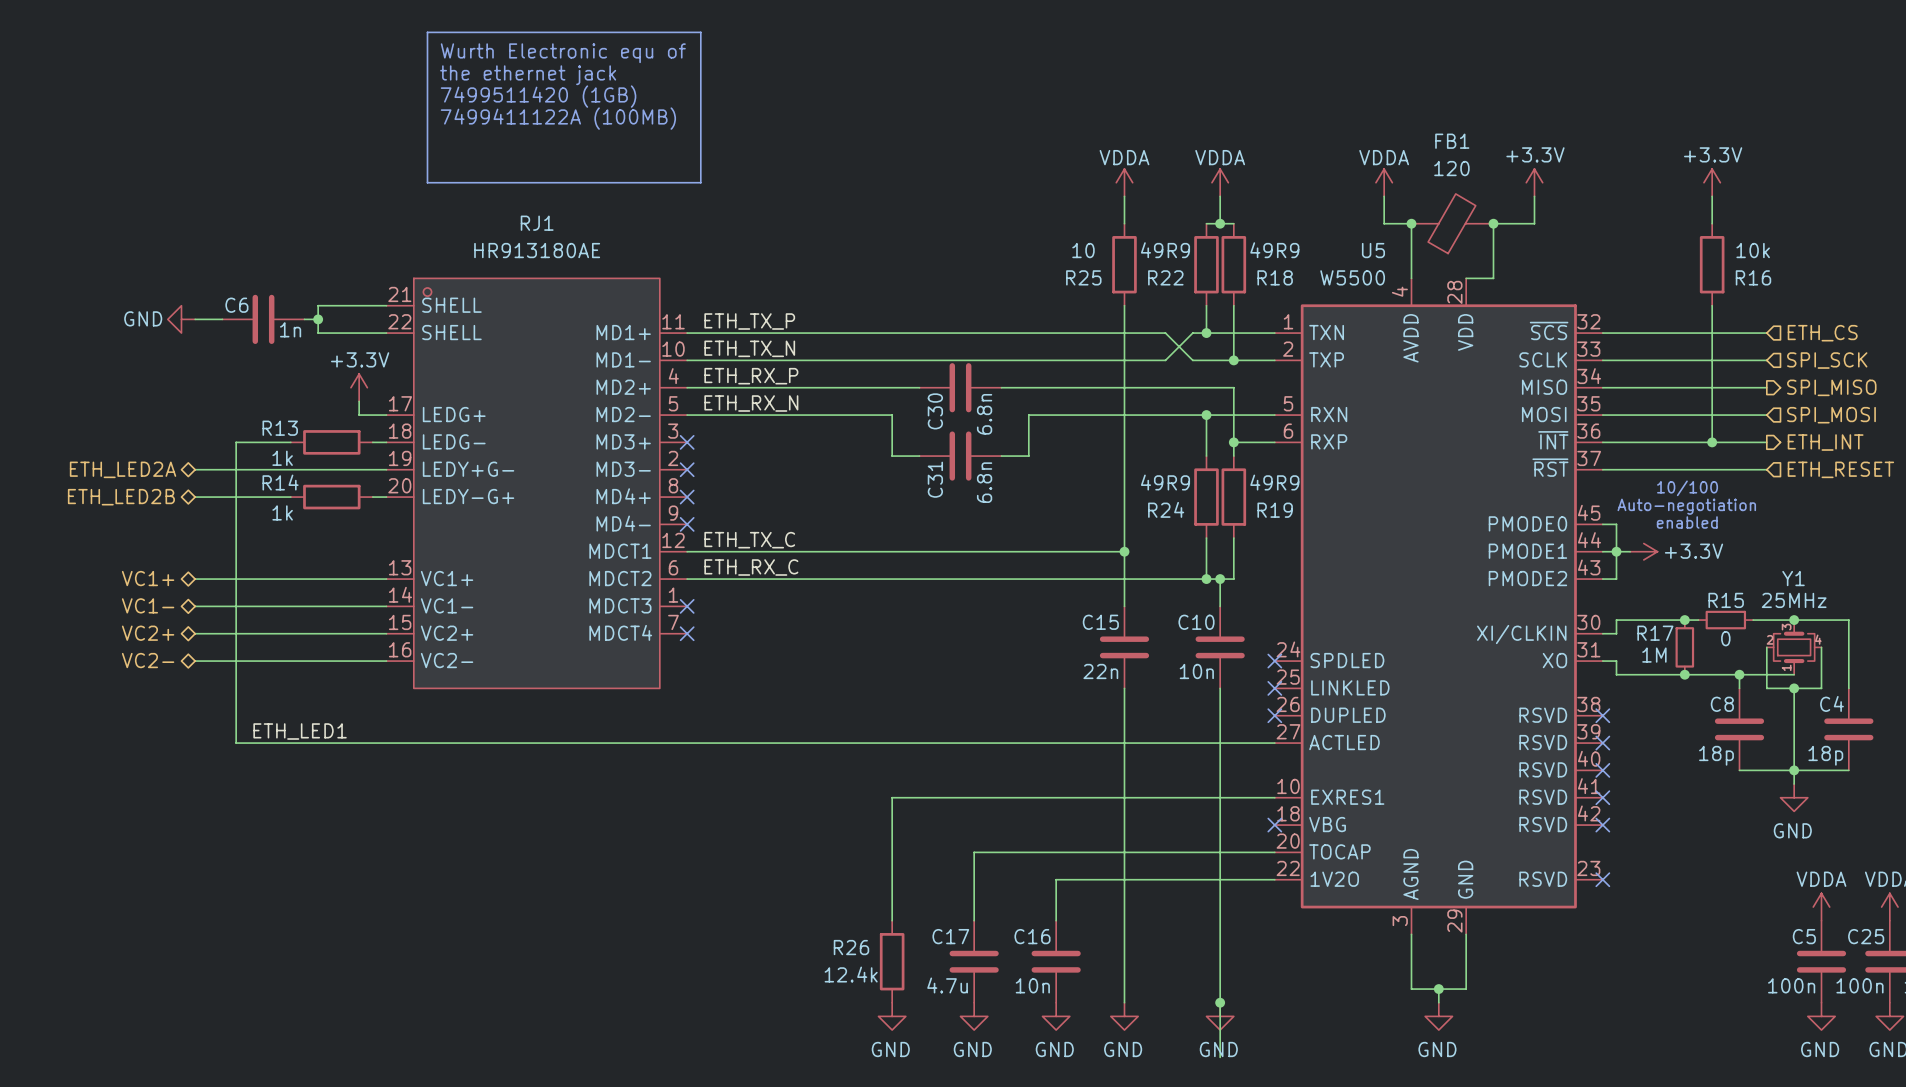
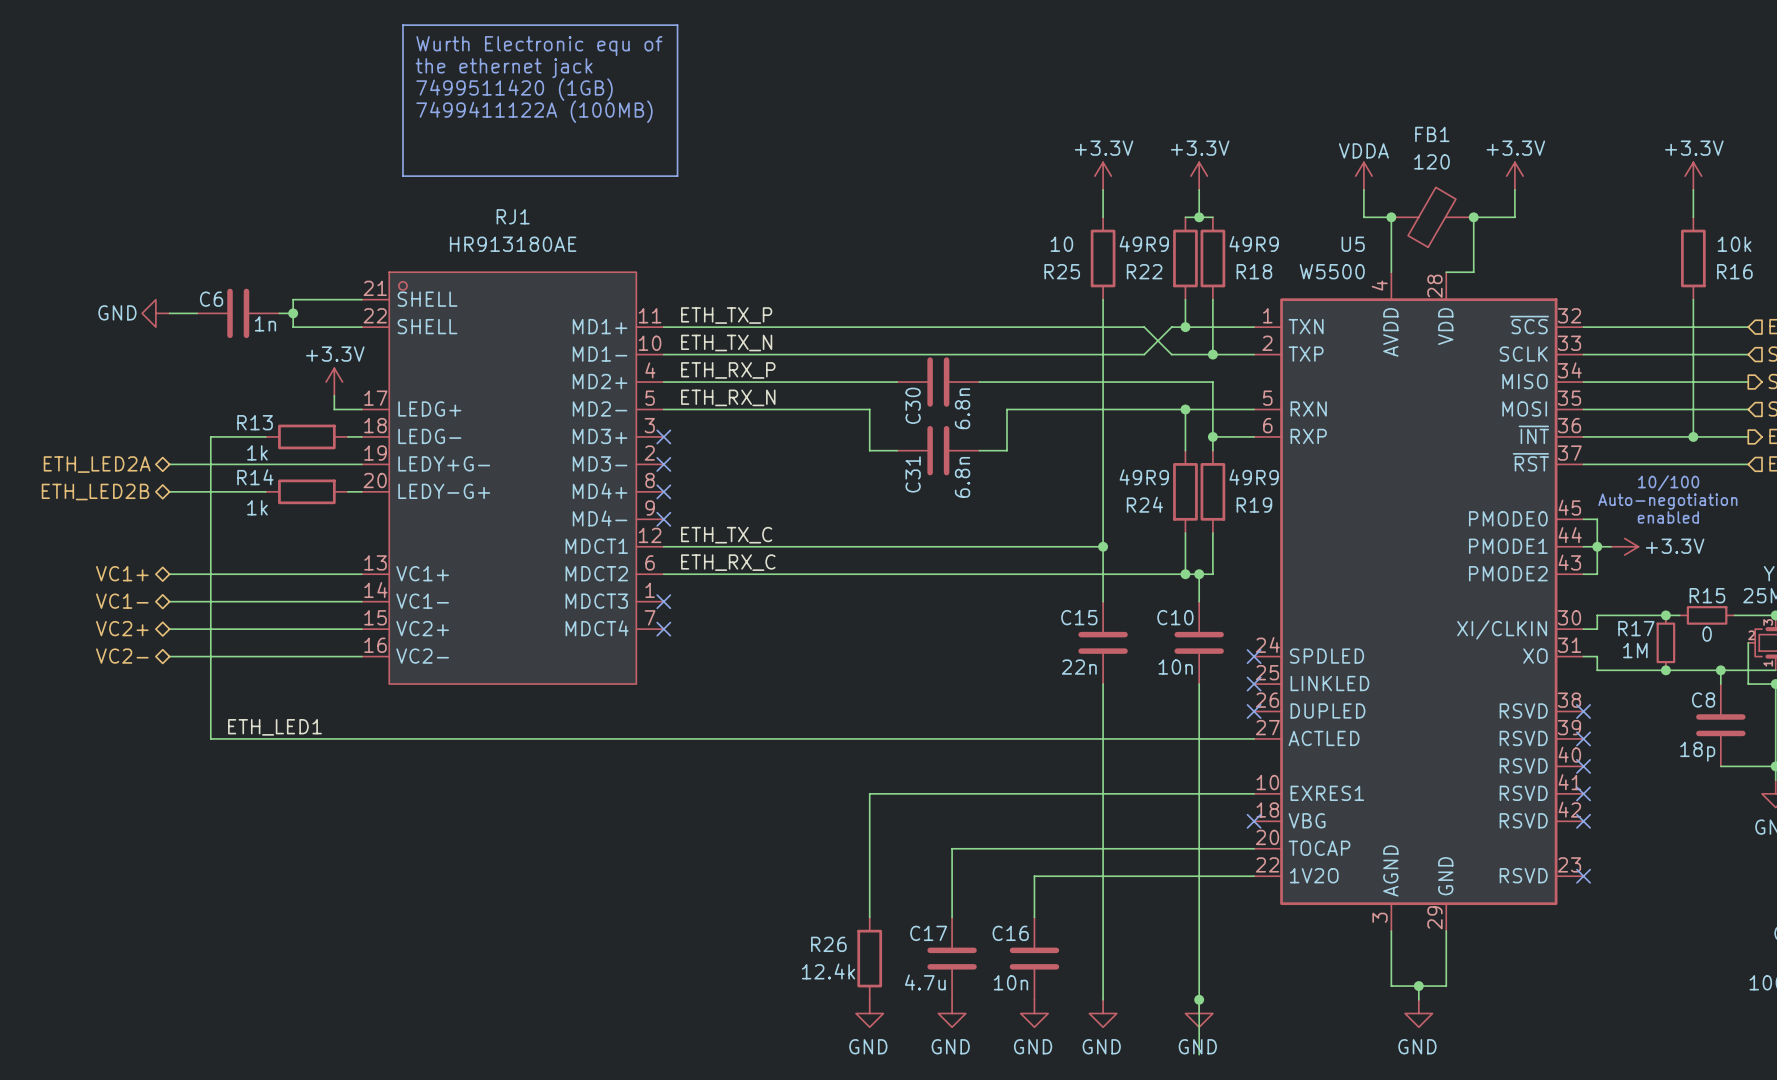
power symbol: VDDA (1124, 182) -> +3.3V (1103, 176)
power symbol: VDDA (1220, 182) -> +3.3V (1199, 176)

